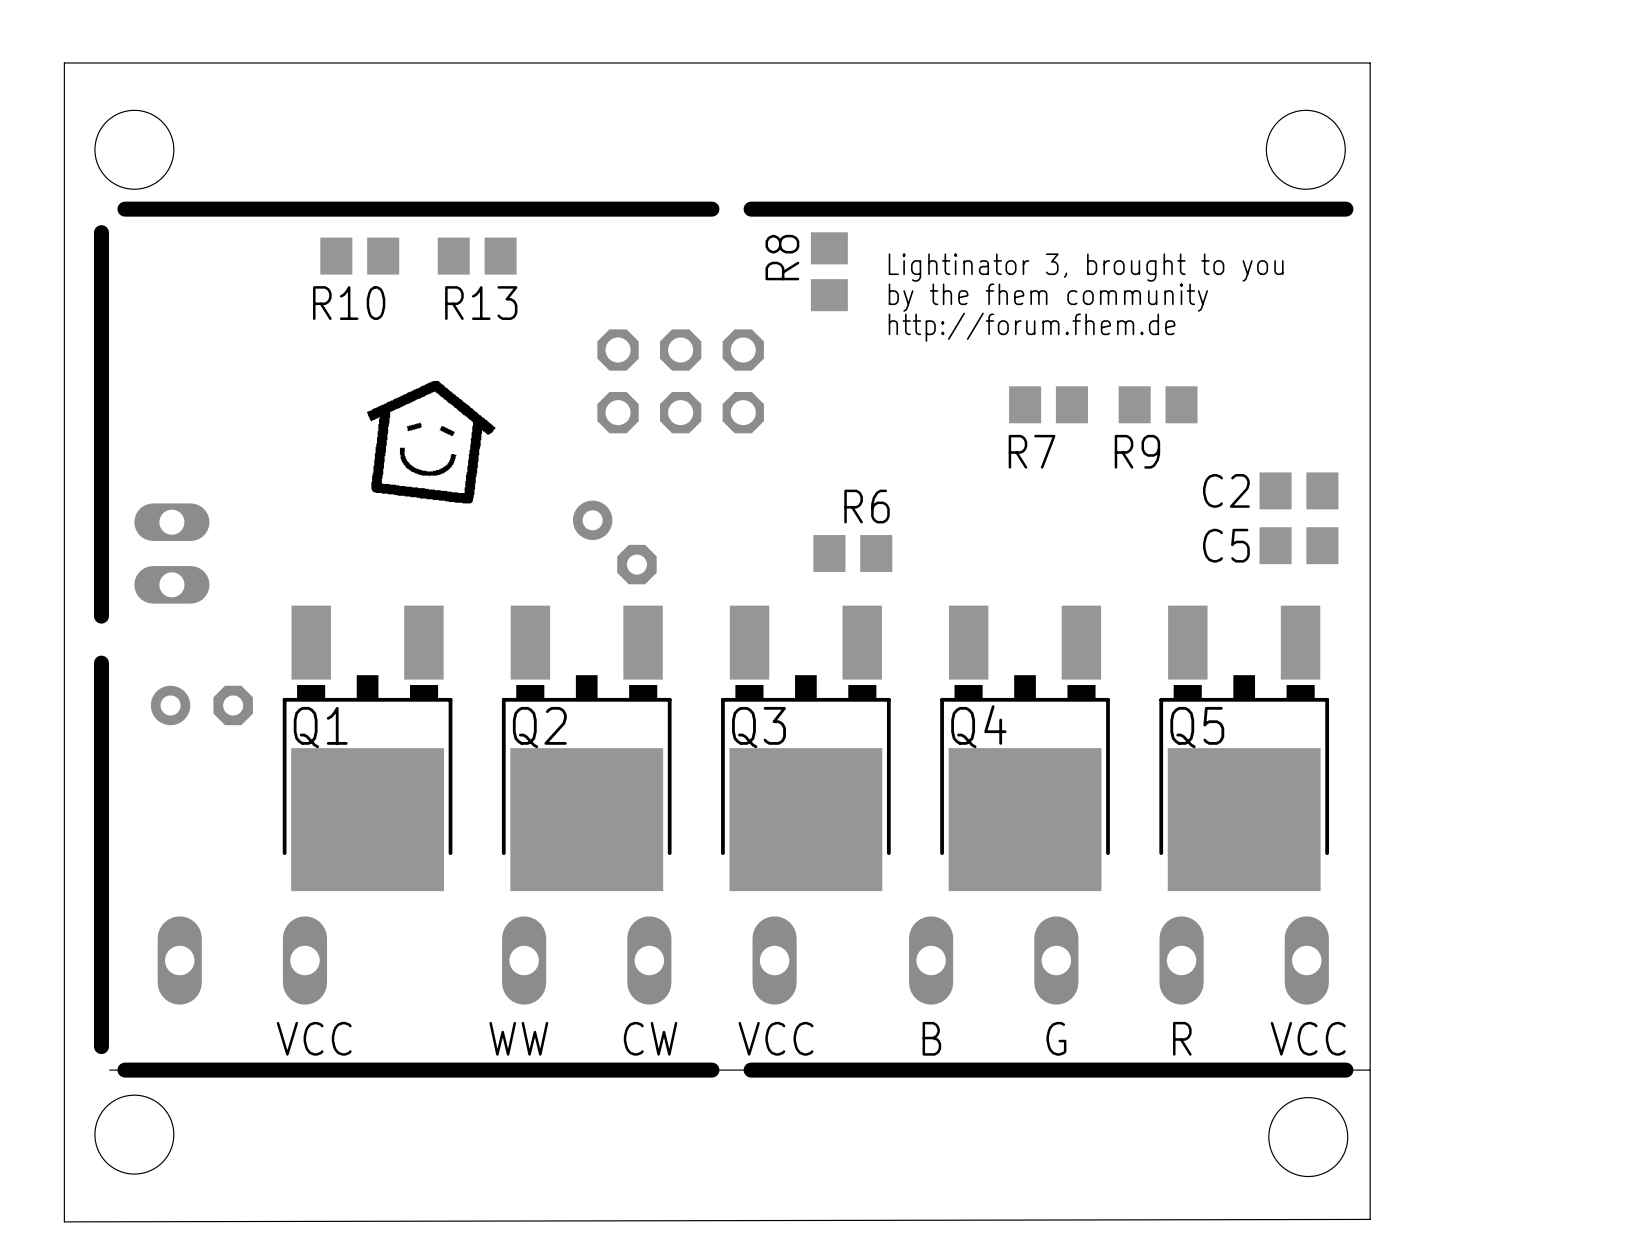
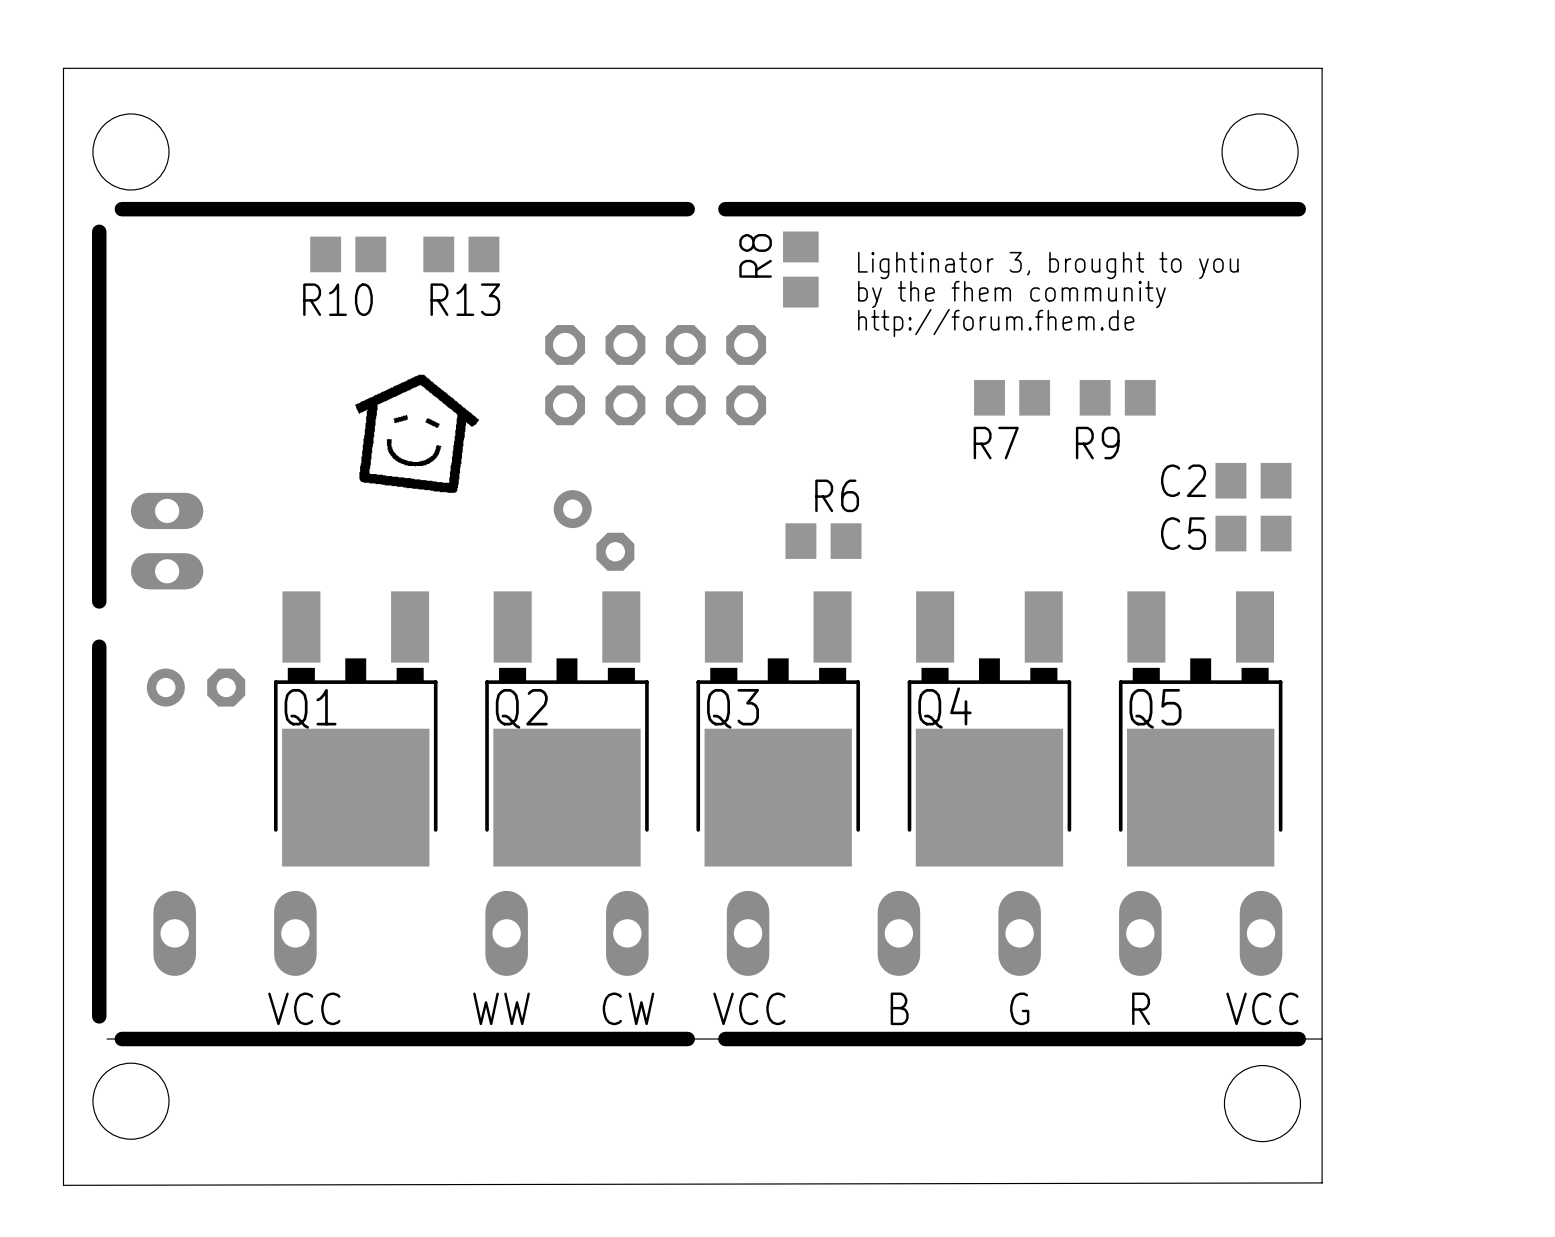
part footprint: [597, 329, 764, 434] -> [545, 325, 767, 426]

